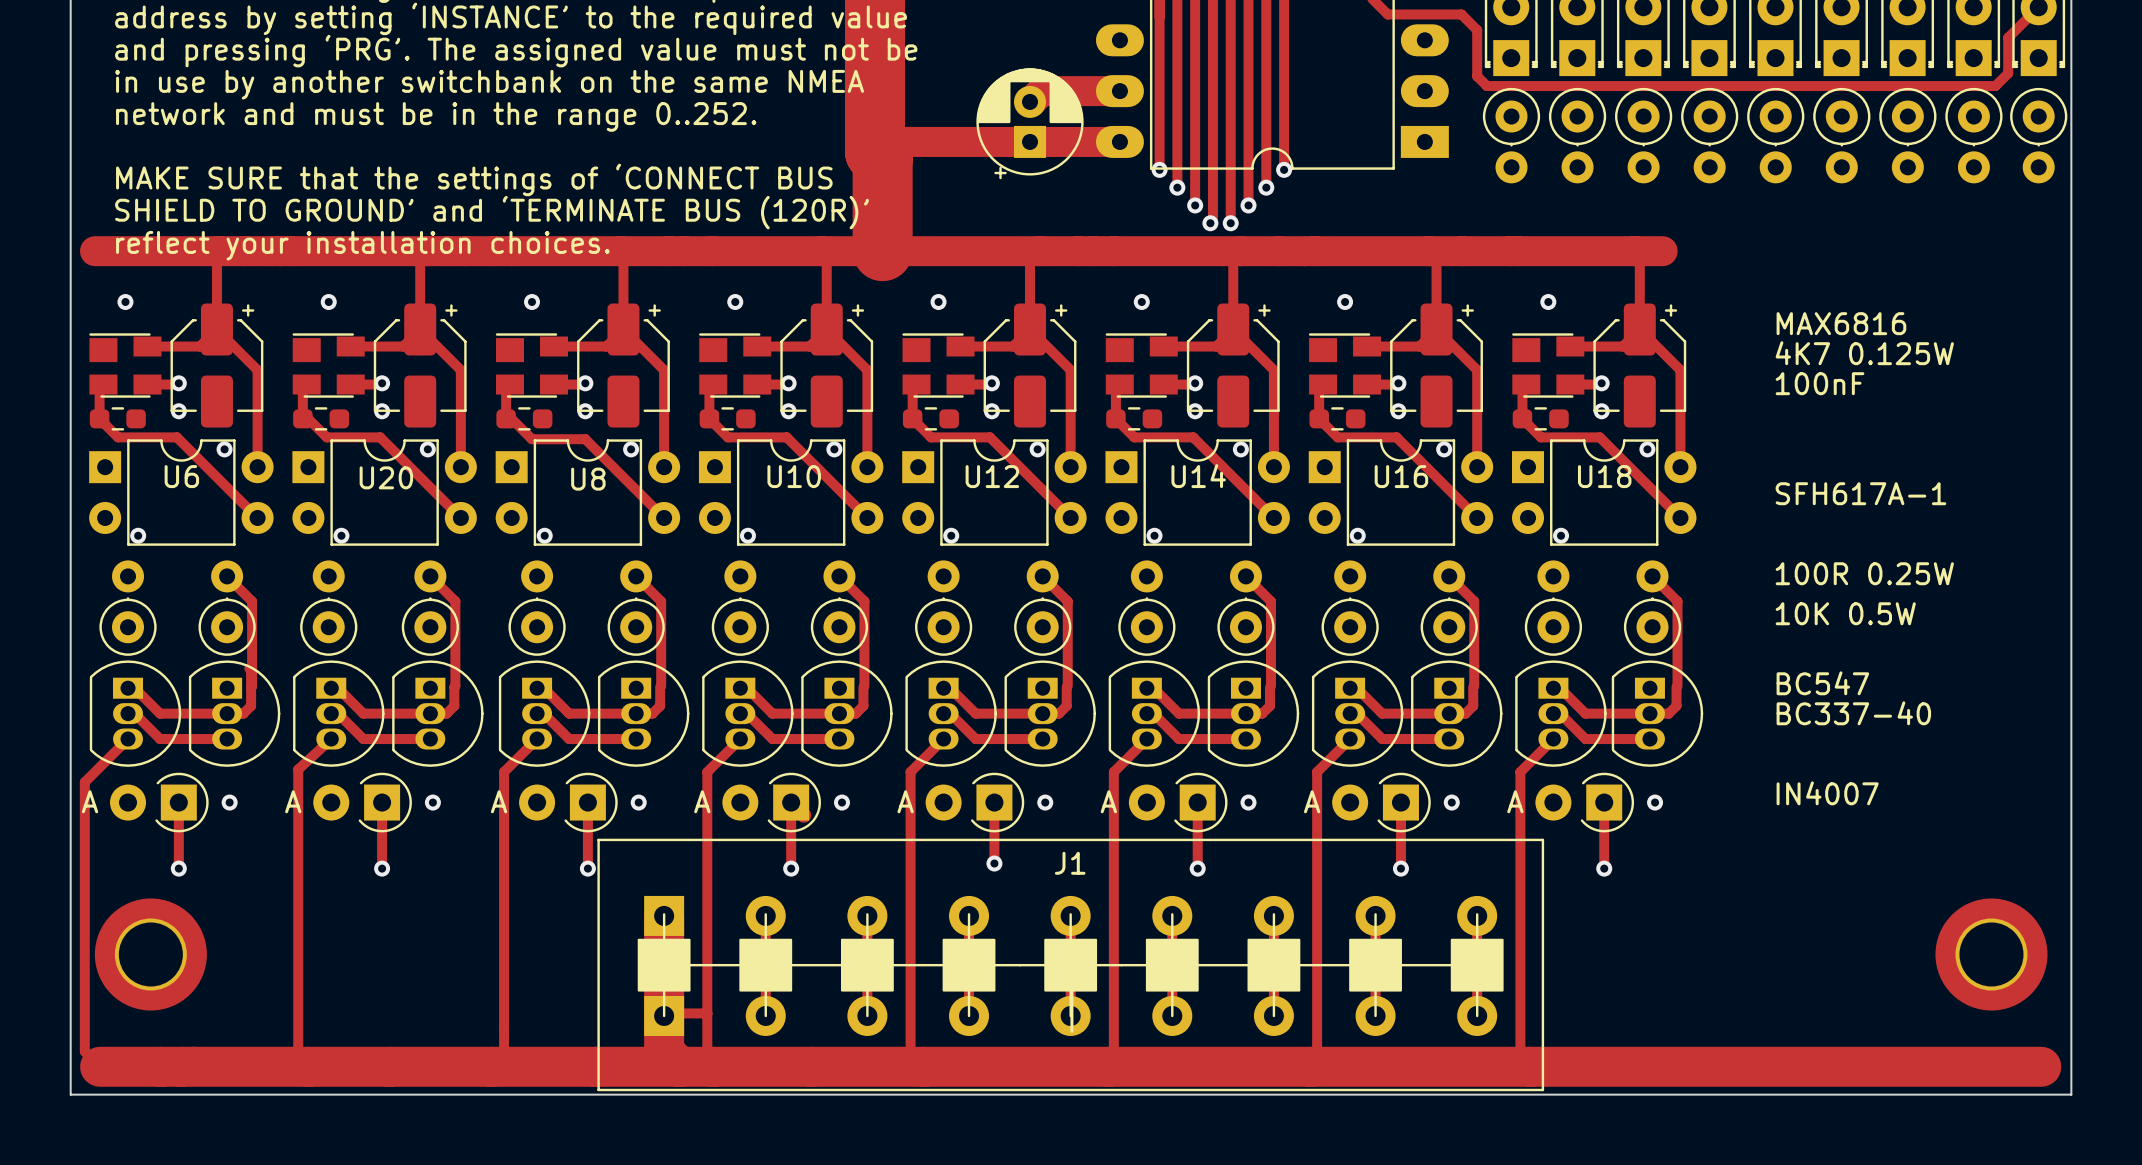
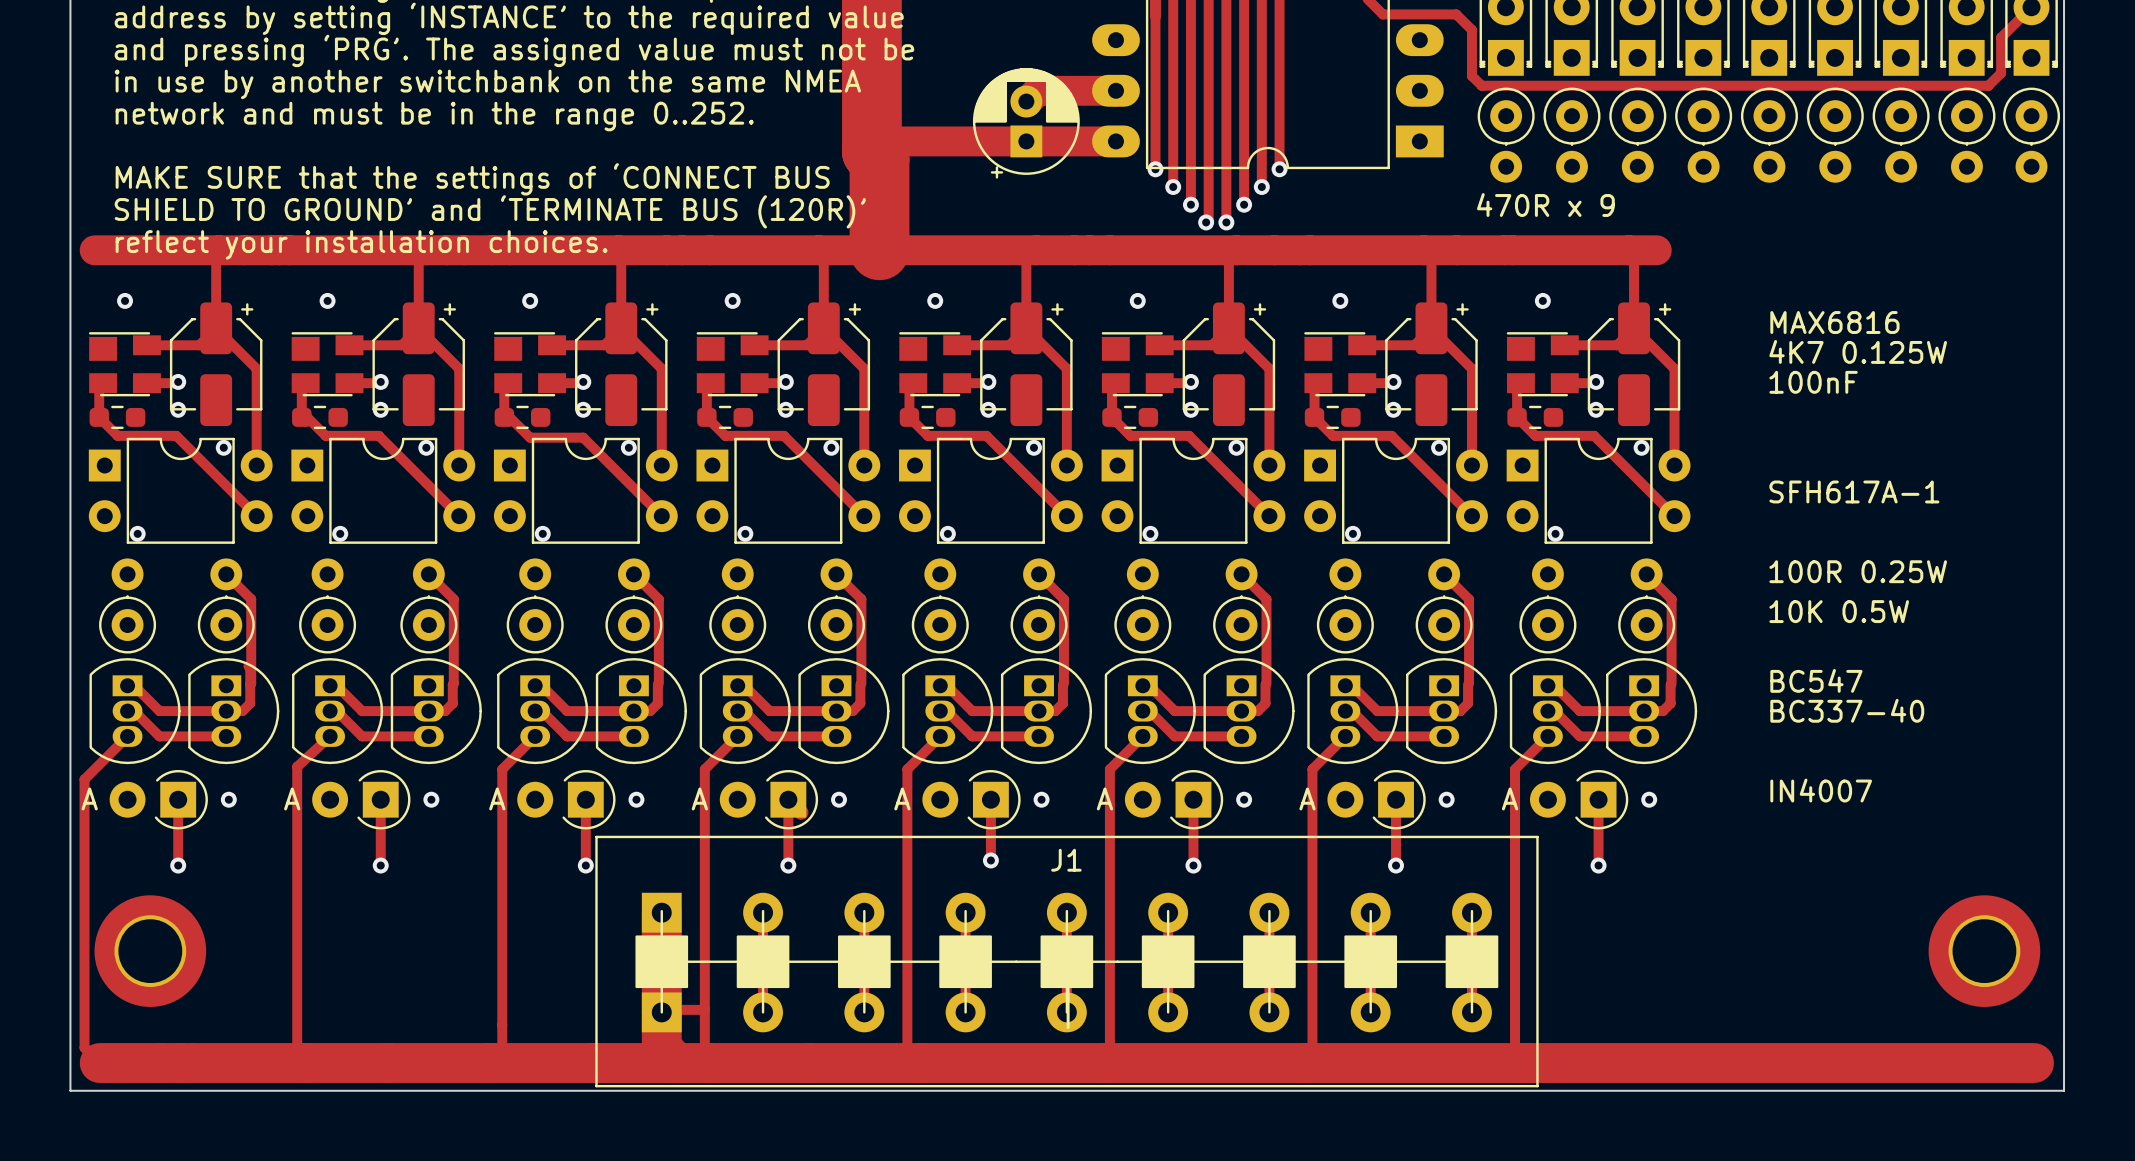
part value: none -> 470R x 9 (1545, 205)
U6 name: U6 (181, 476) -> none
U10 name: U10 (794, 476) -> none
U12 name: U12 (992, 476) -> none
U14 name: U14 (1198, 476) -> none
U16 name: U16 (1401, 476) -> none
U18 name: U18 (1604, 476) -> none
U20 name: U20 (386, 477) -> none
U8 name: U8 (588, 479) -> none

